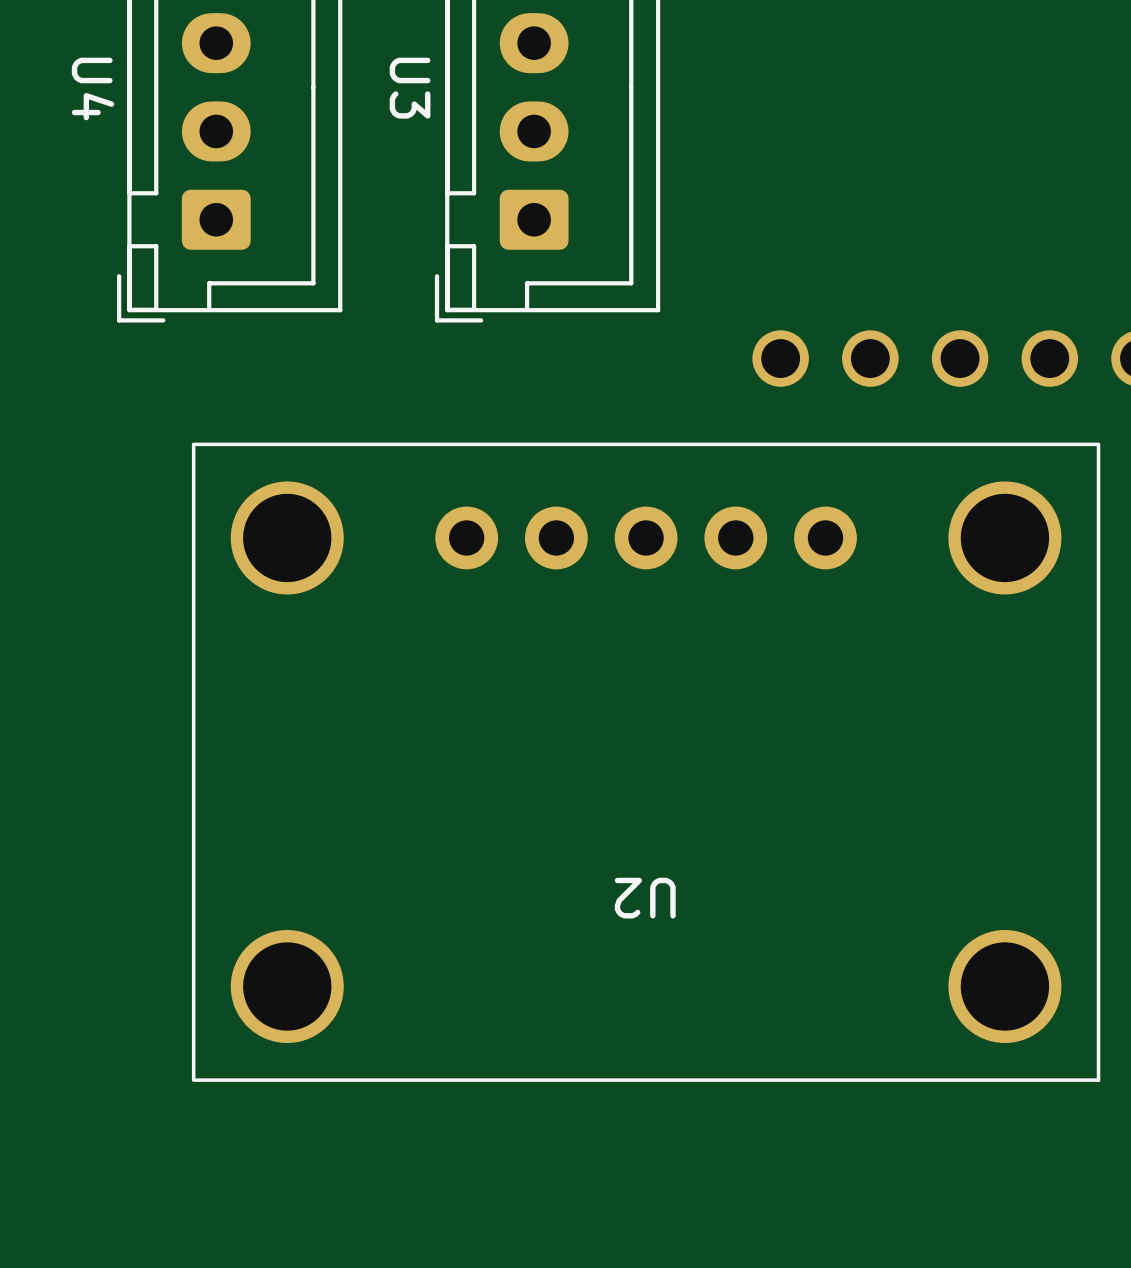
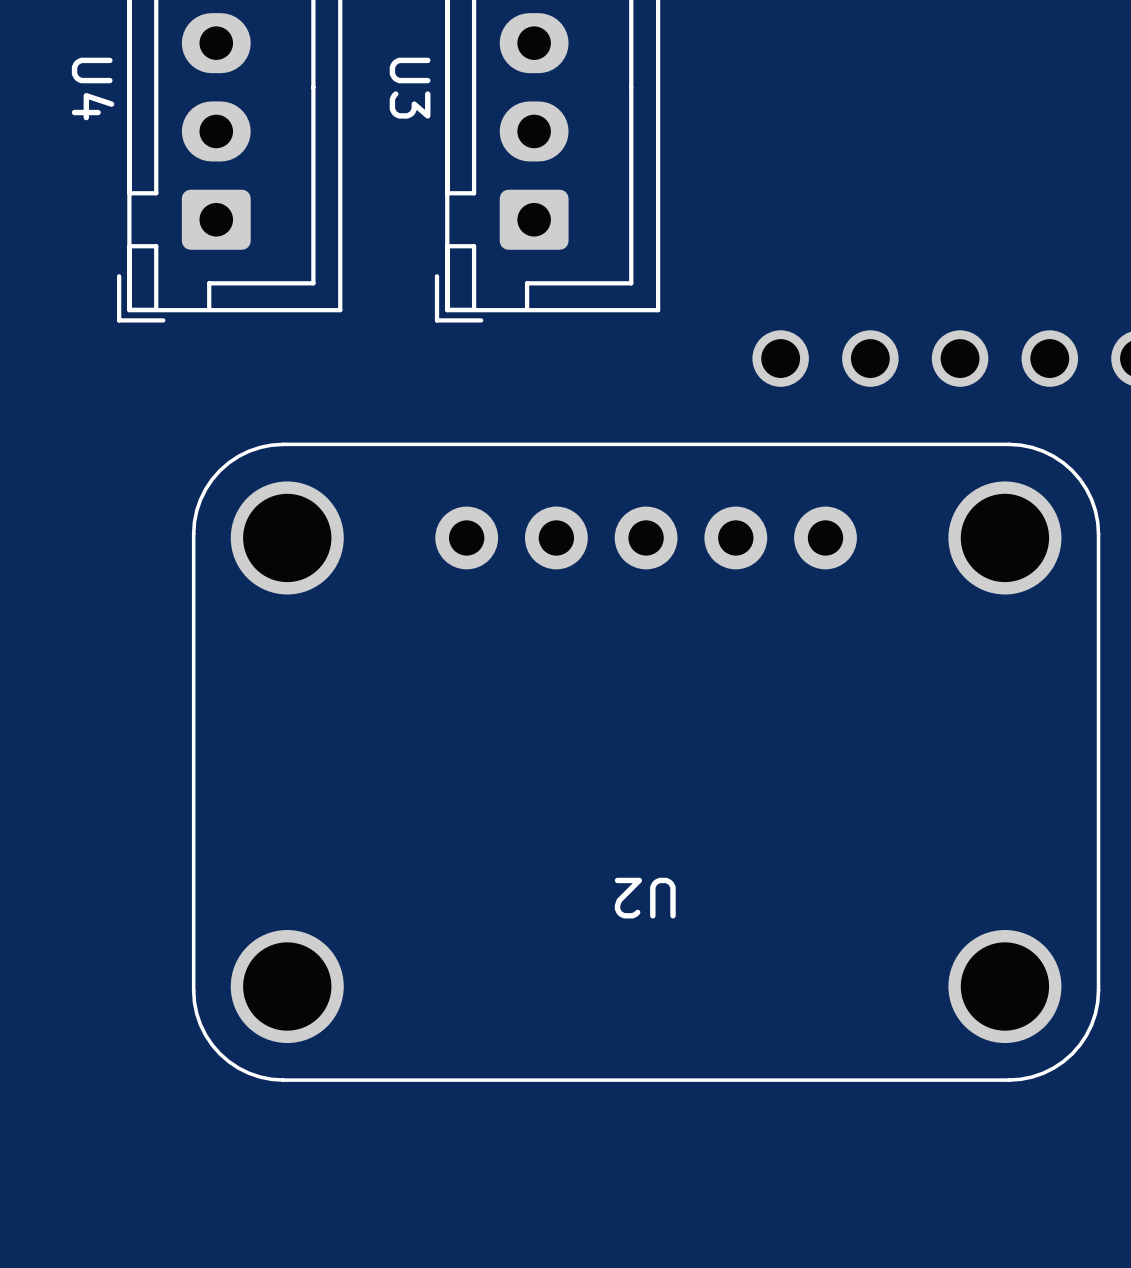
U2 footprint: [191, 442, 1101, 1082] -> [191, 442, 1101, 1082]

